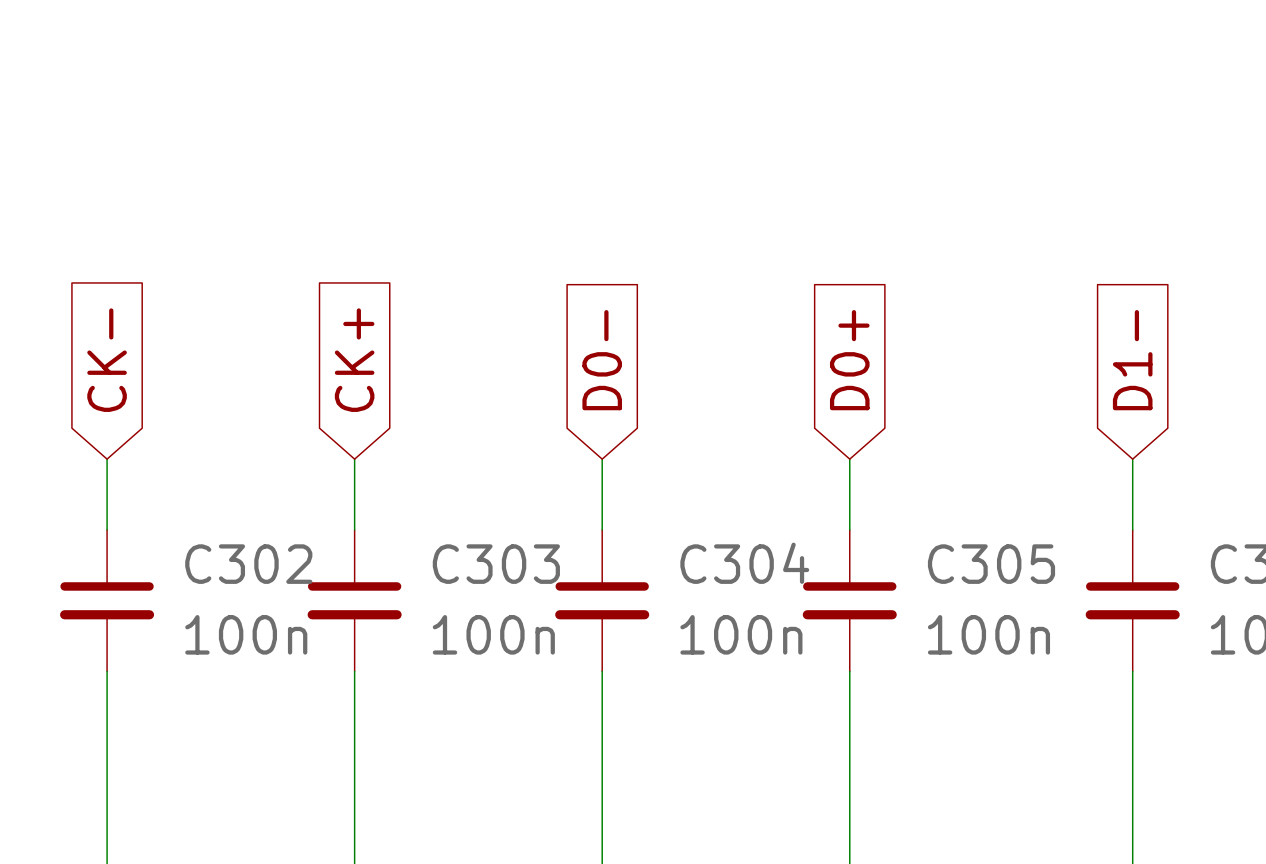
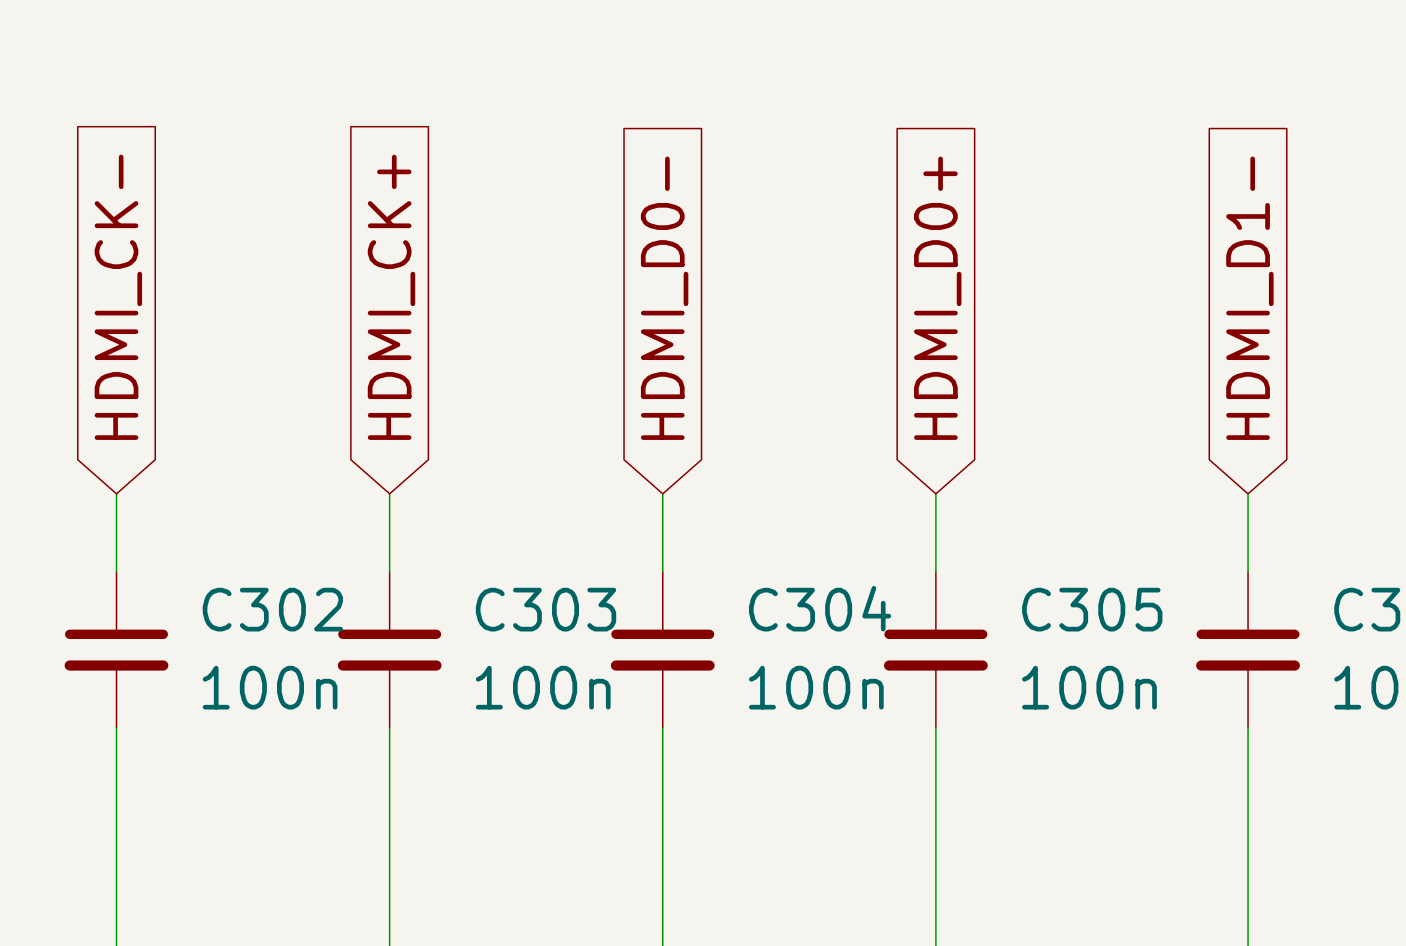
global label: CK- (107, 360) -> HDMI_CK- (118, 297)
global label: CK+ (354, 360) -> HDMI_CK+ (391, 297)
global label: D0- (602, 360) -> HDMI_D0- (664, 298)
global label: D0+ (849, 360) -> HDMI_D0+ (937, 298)
global label: D1- (1132, 360) -> HDMI_D1- (1249, 298)

